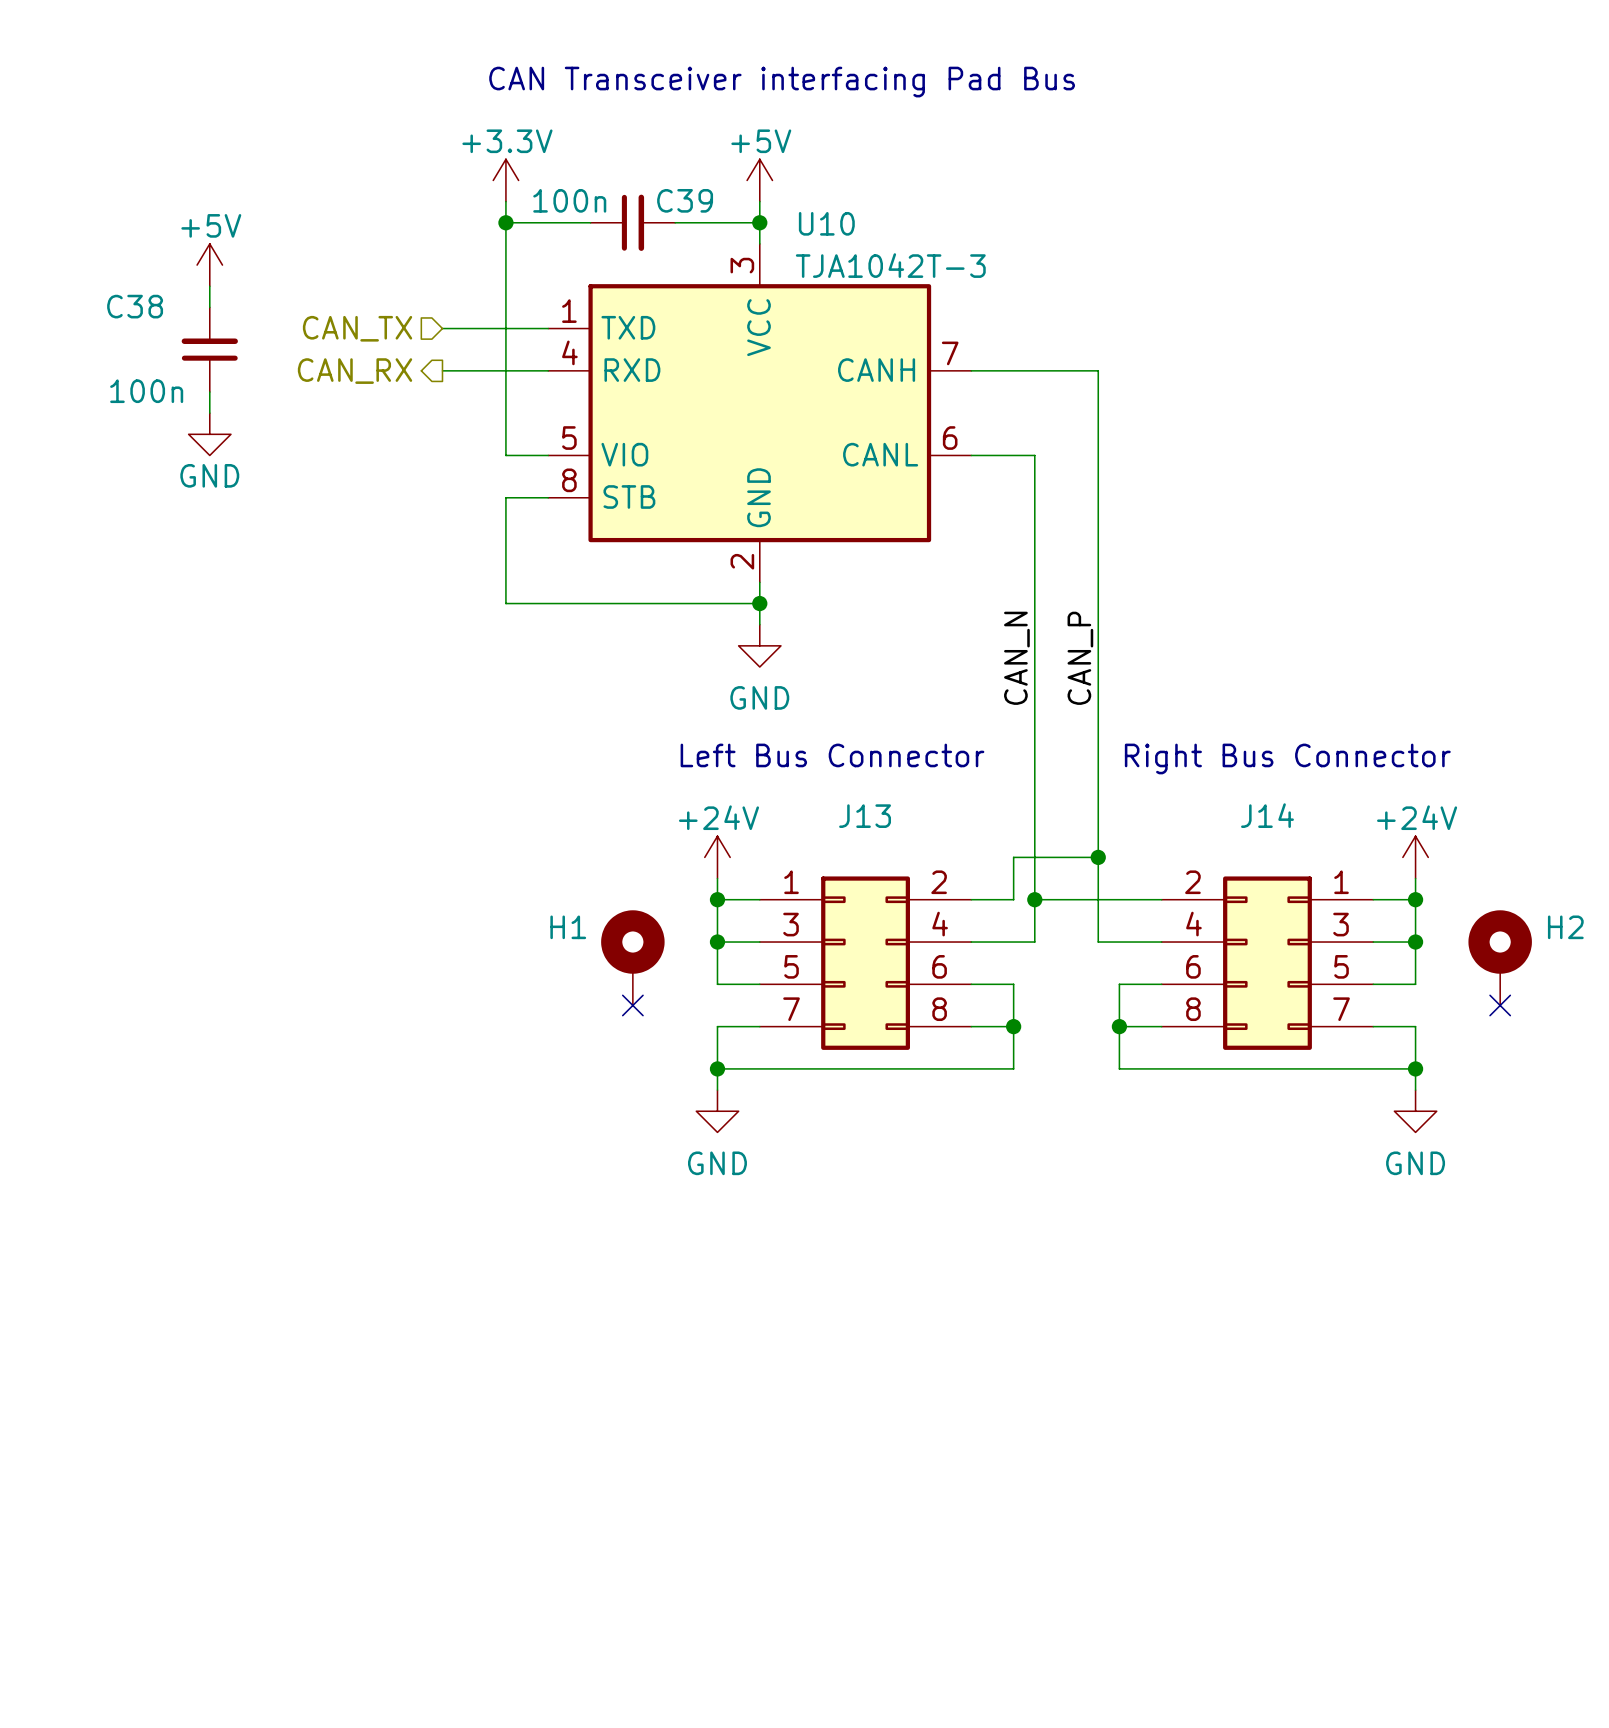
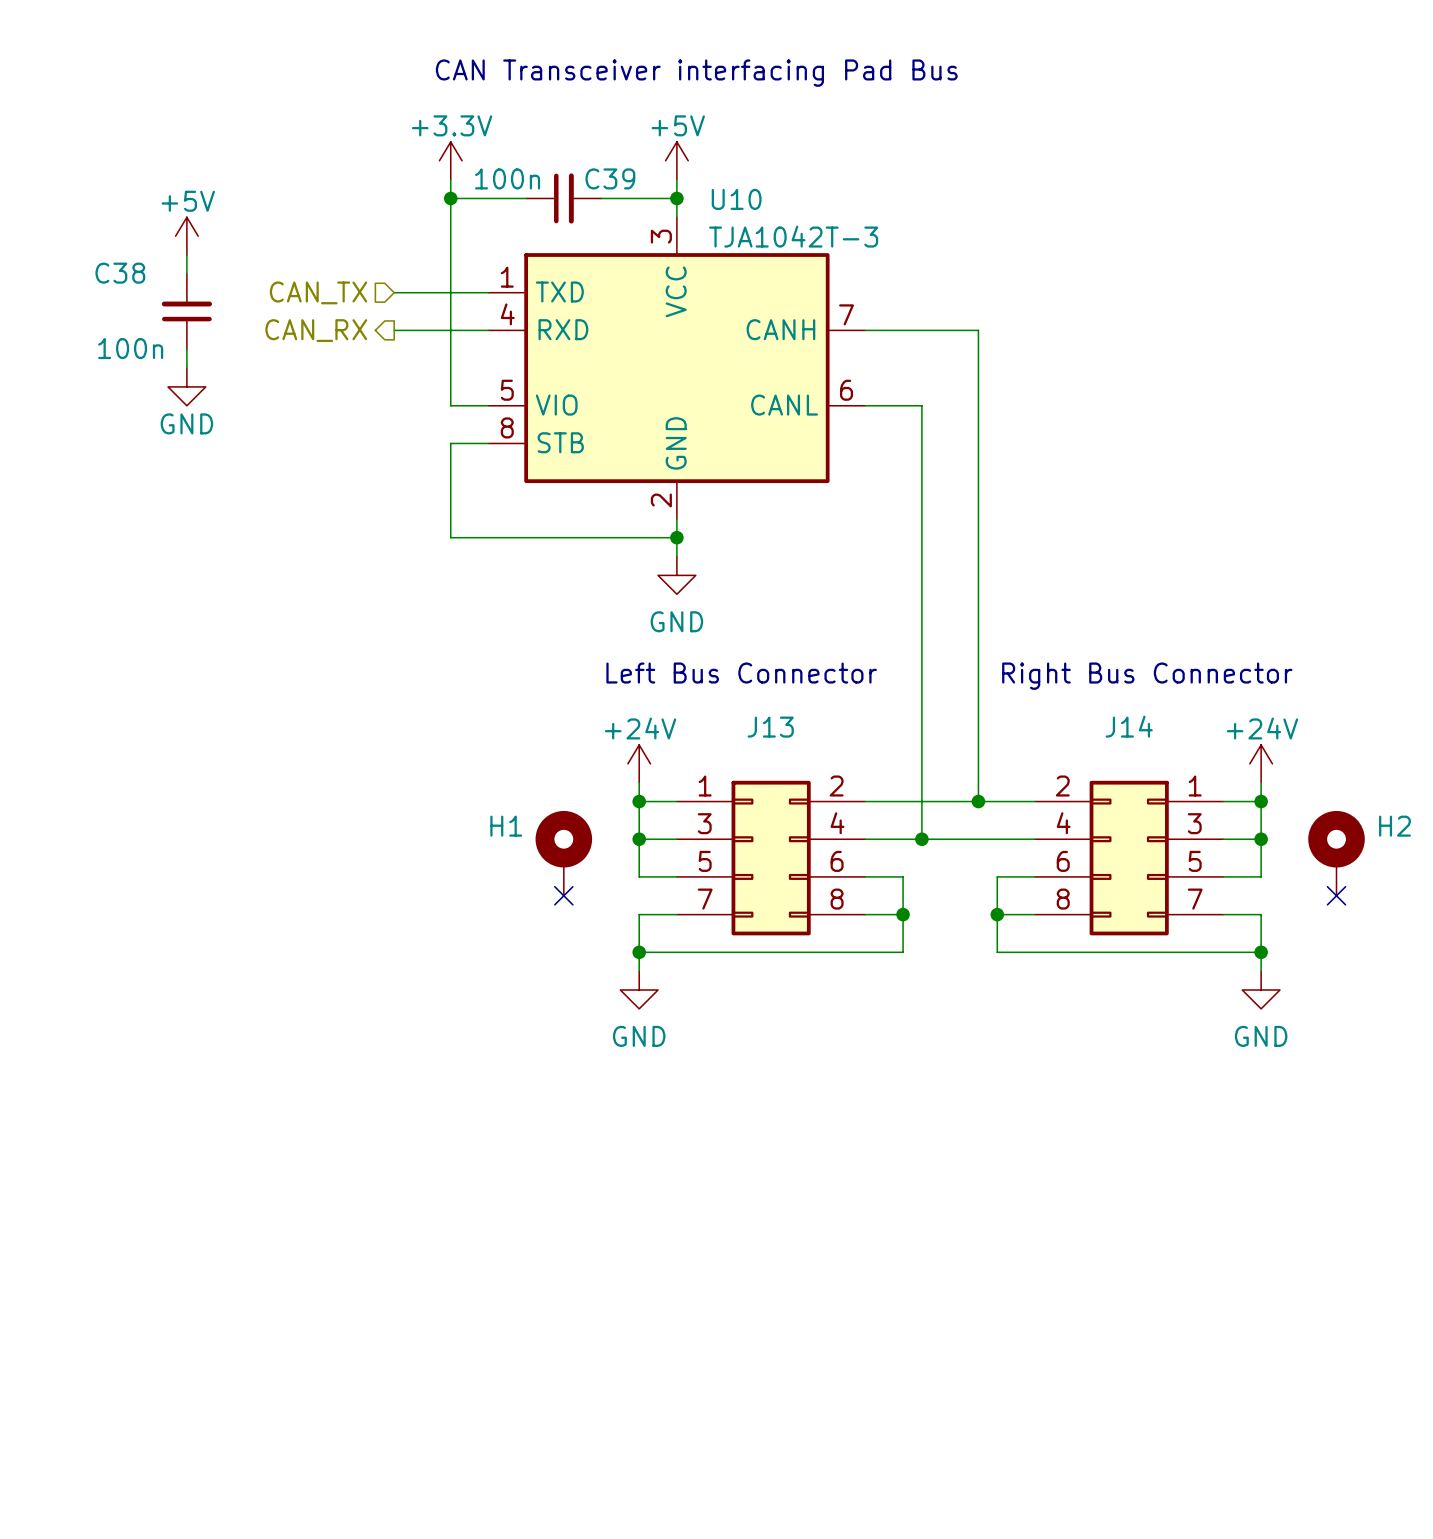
label: CAN_N (1016, 658) -> none
label: CAN_P (1080, 658) -> none
wire: (1098, 857) (1013, 857) (1013, 899) -> (921, 801) (903, 801)
junction: (1098, 857) -> none
junction: (1034, 899) -> none
wire: (1098, 899) (1098, 942) -> (921, 839) (978, 839)
junction: none -> (978, 801)
junction: none -> (921, 839)

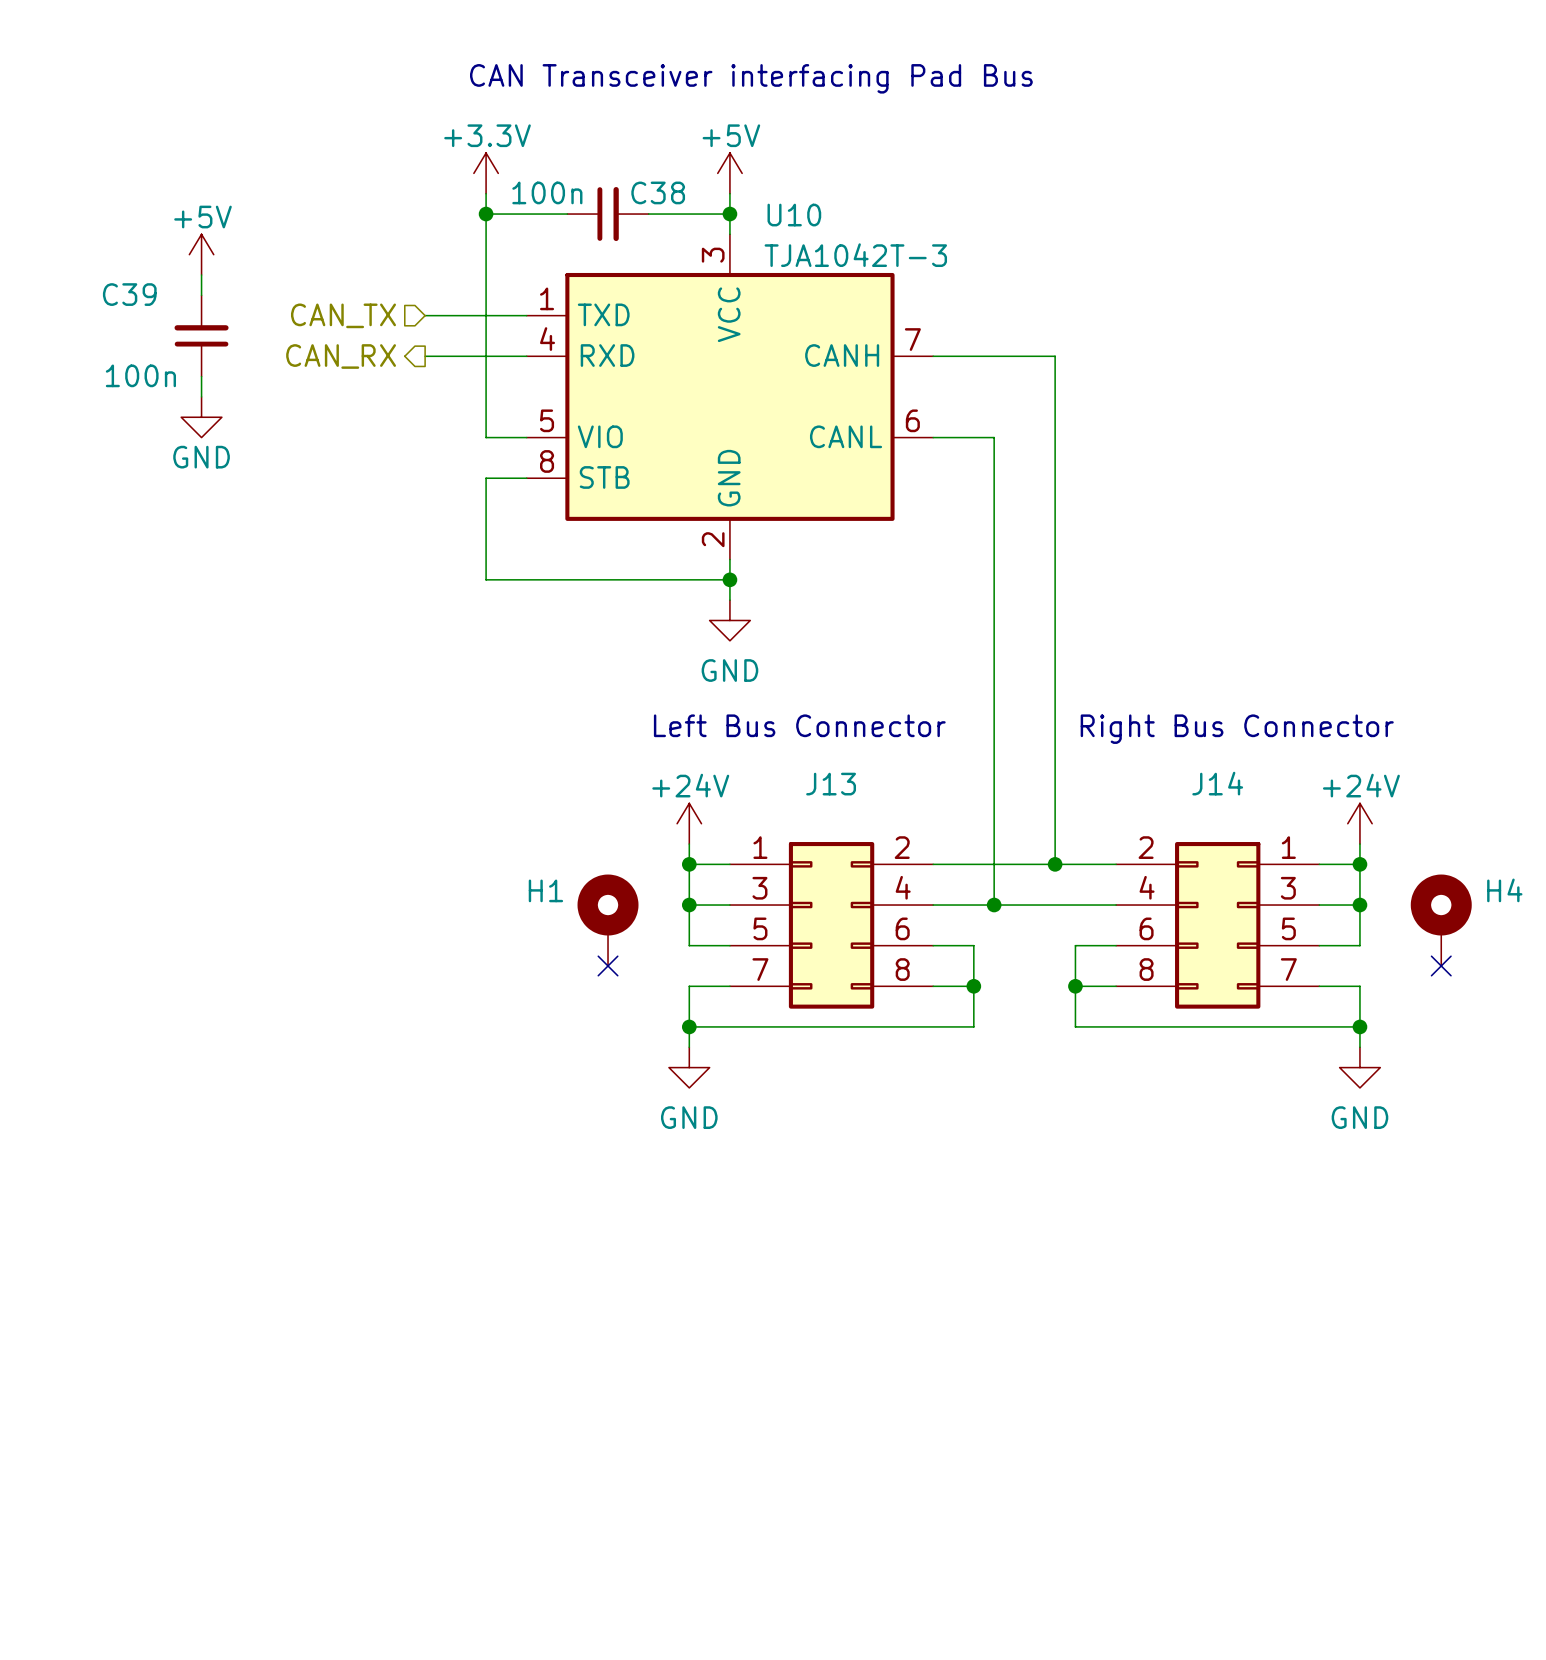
C39 name: C39 (610, 178) -> C38 (658, 192)
C38 name: C38 (120, 273) -> C39 (129, 294)
H2 name: H2 (1394, 826) -> H4 (1504, 890)

